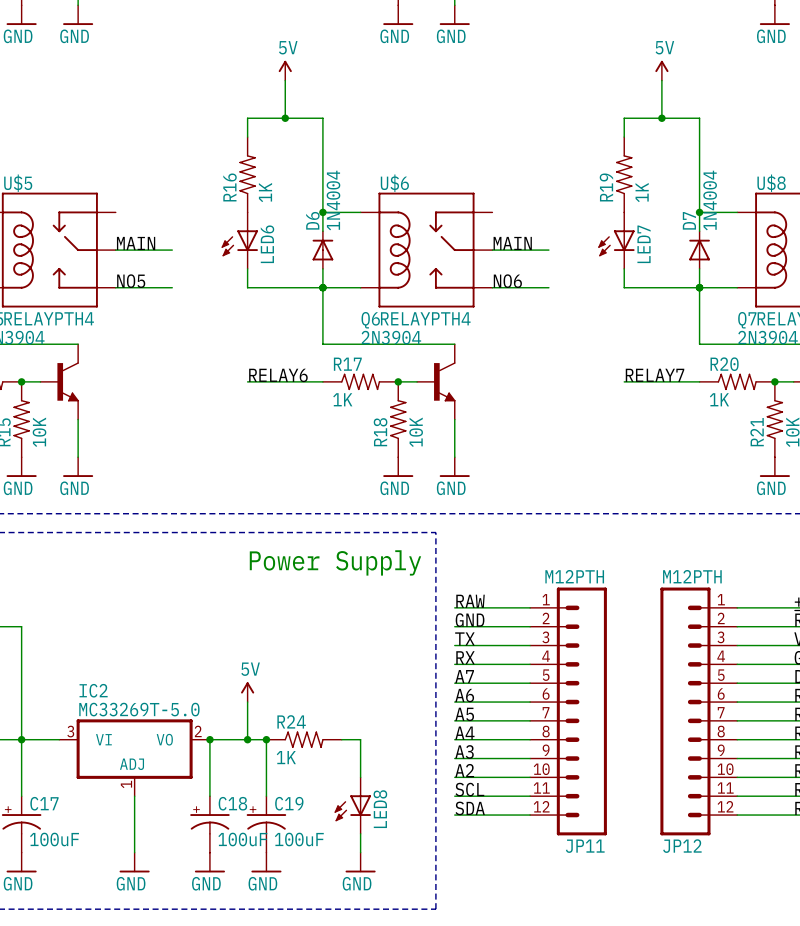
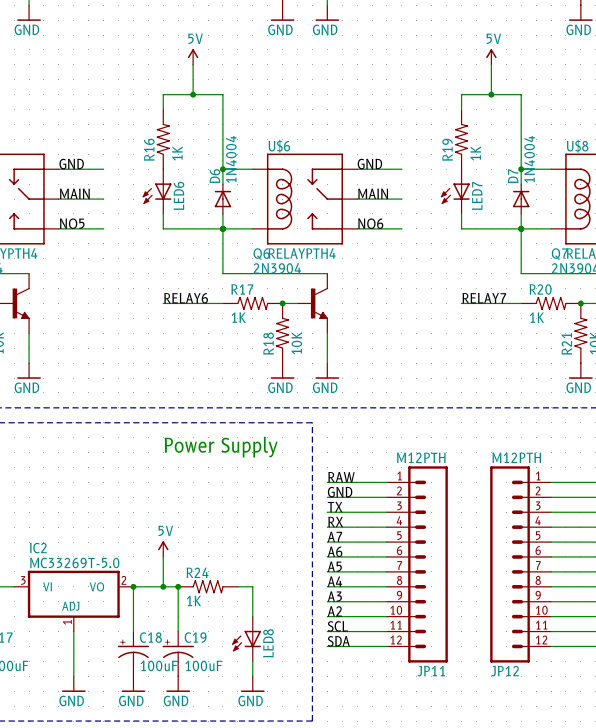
label: none -> GND (71, 164)
label: none -> GND (369, 164)
wire: none -> (58, 169) (103, 169)
wire: none -> (357, 169) (401, 169)

